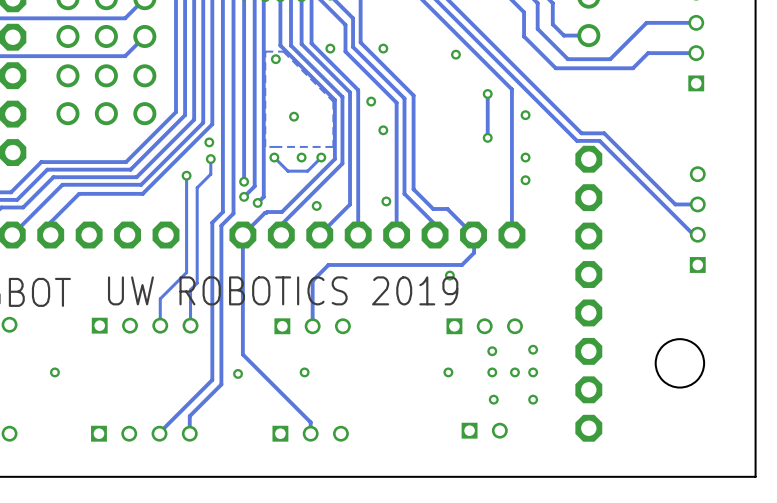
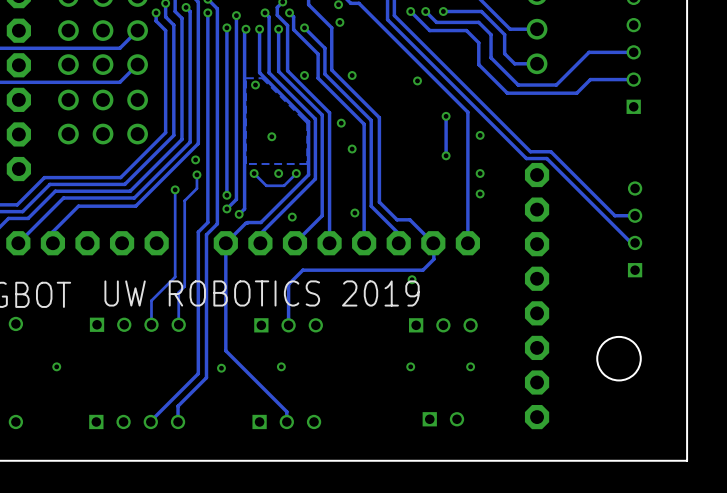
via: (533, 349) -> none
via: (492, 351) -> none
via: (492, 372) -> none
via: (533, 372) -> none
via: (493, 399) -> none
via: (533, 399) -> none

